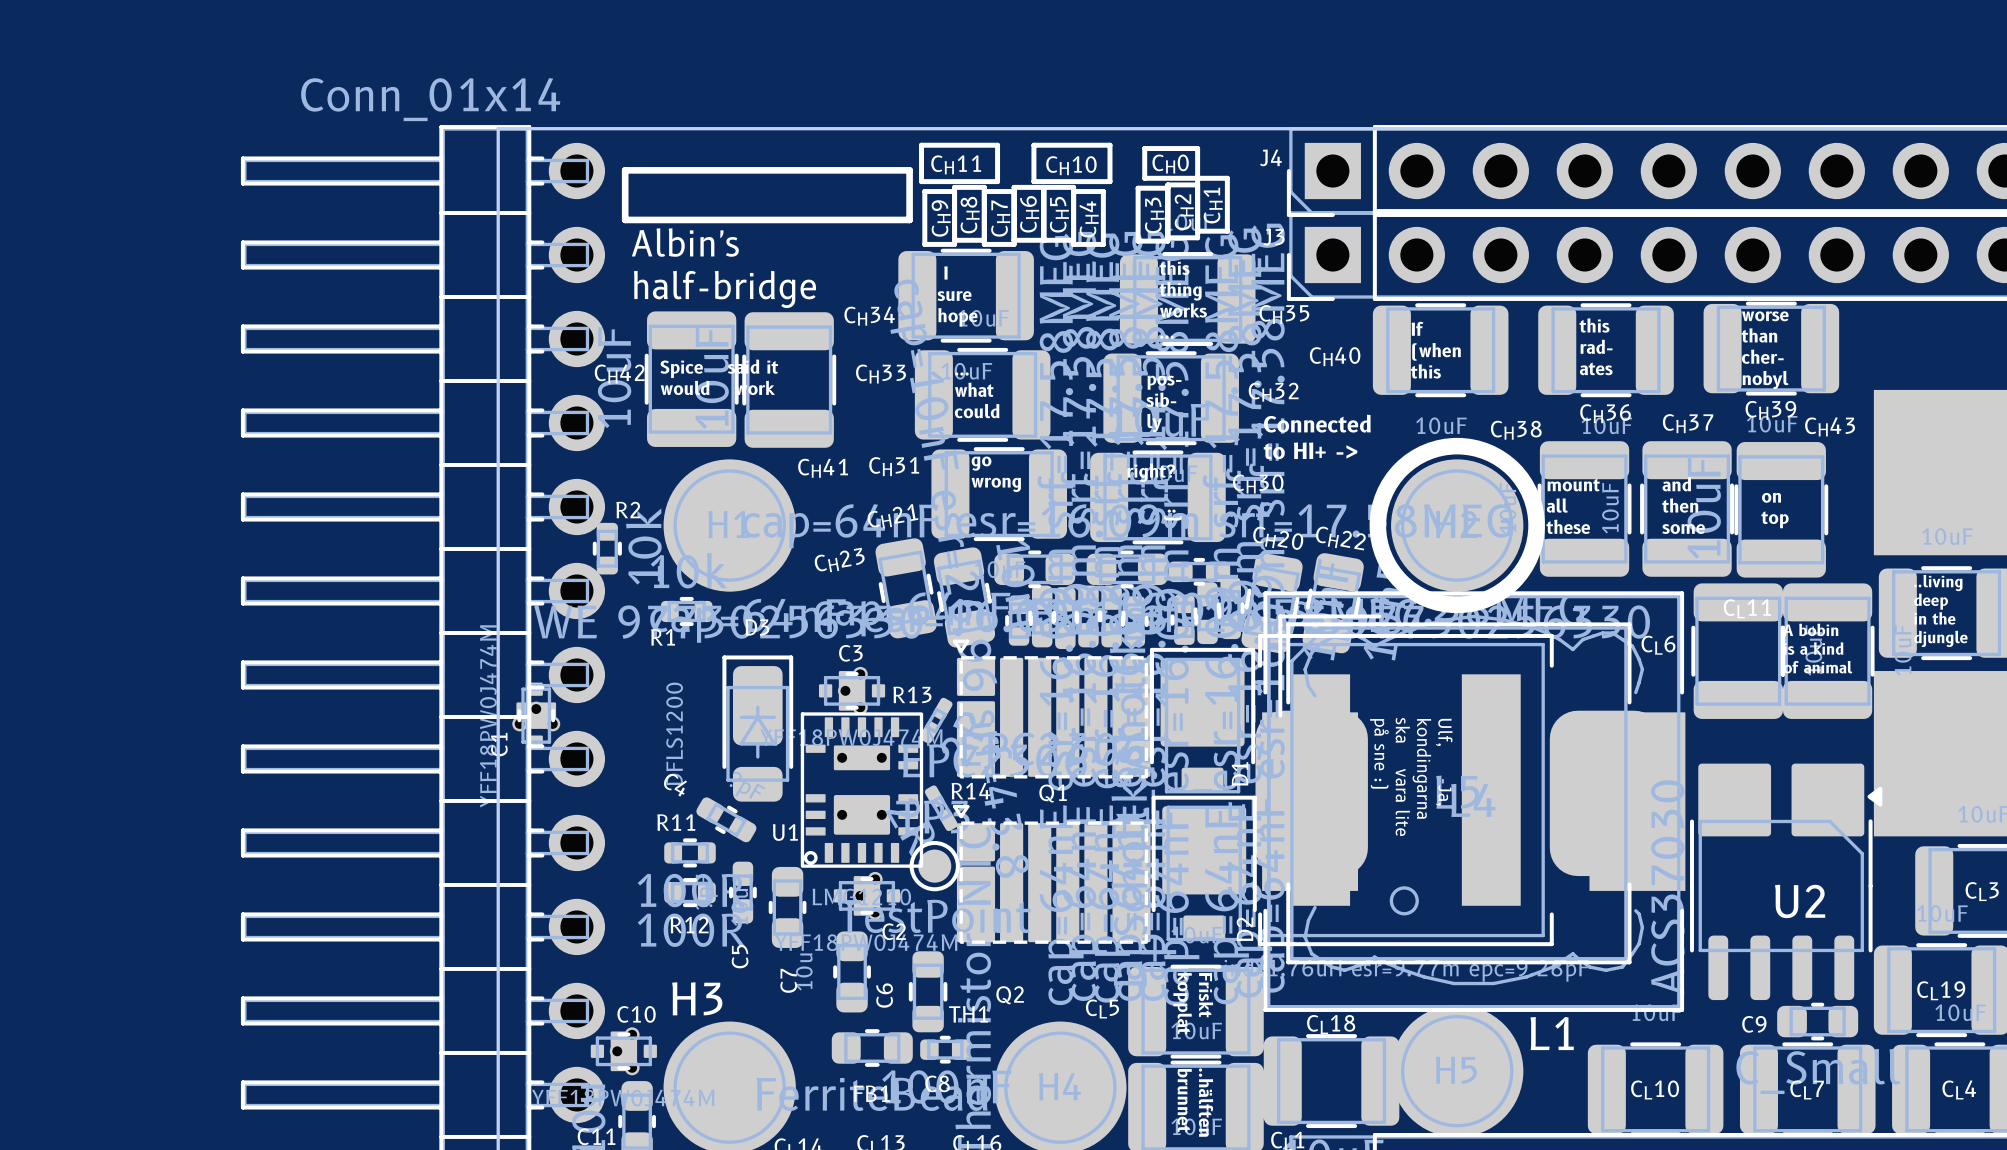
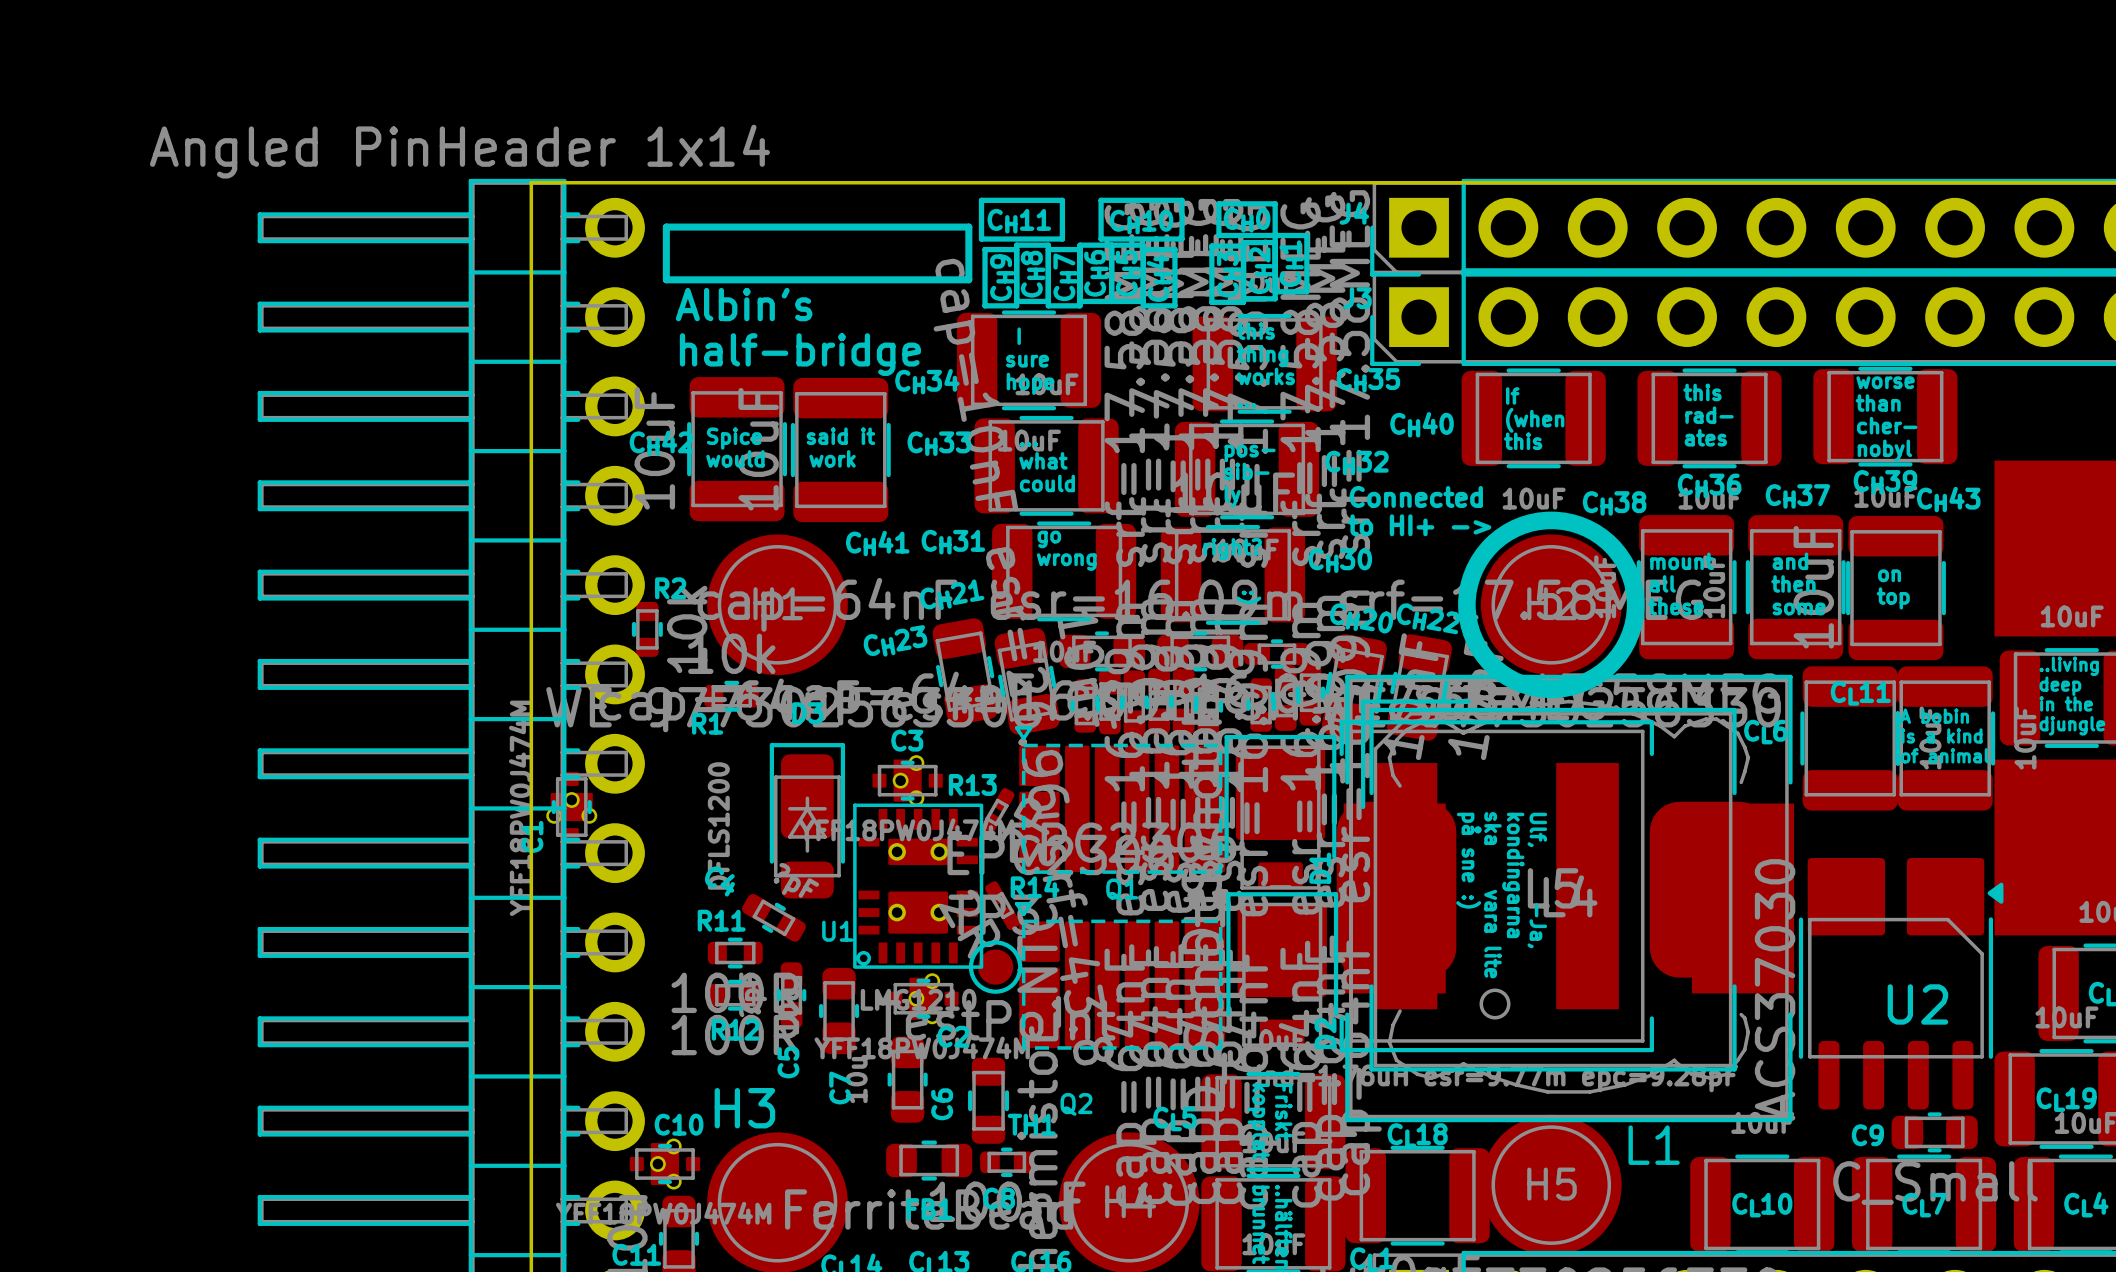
part value: Conn_01x14 (430, 99) -> Angled PinHeader 1x14 (459, 151)

